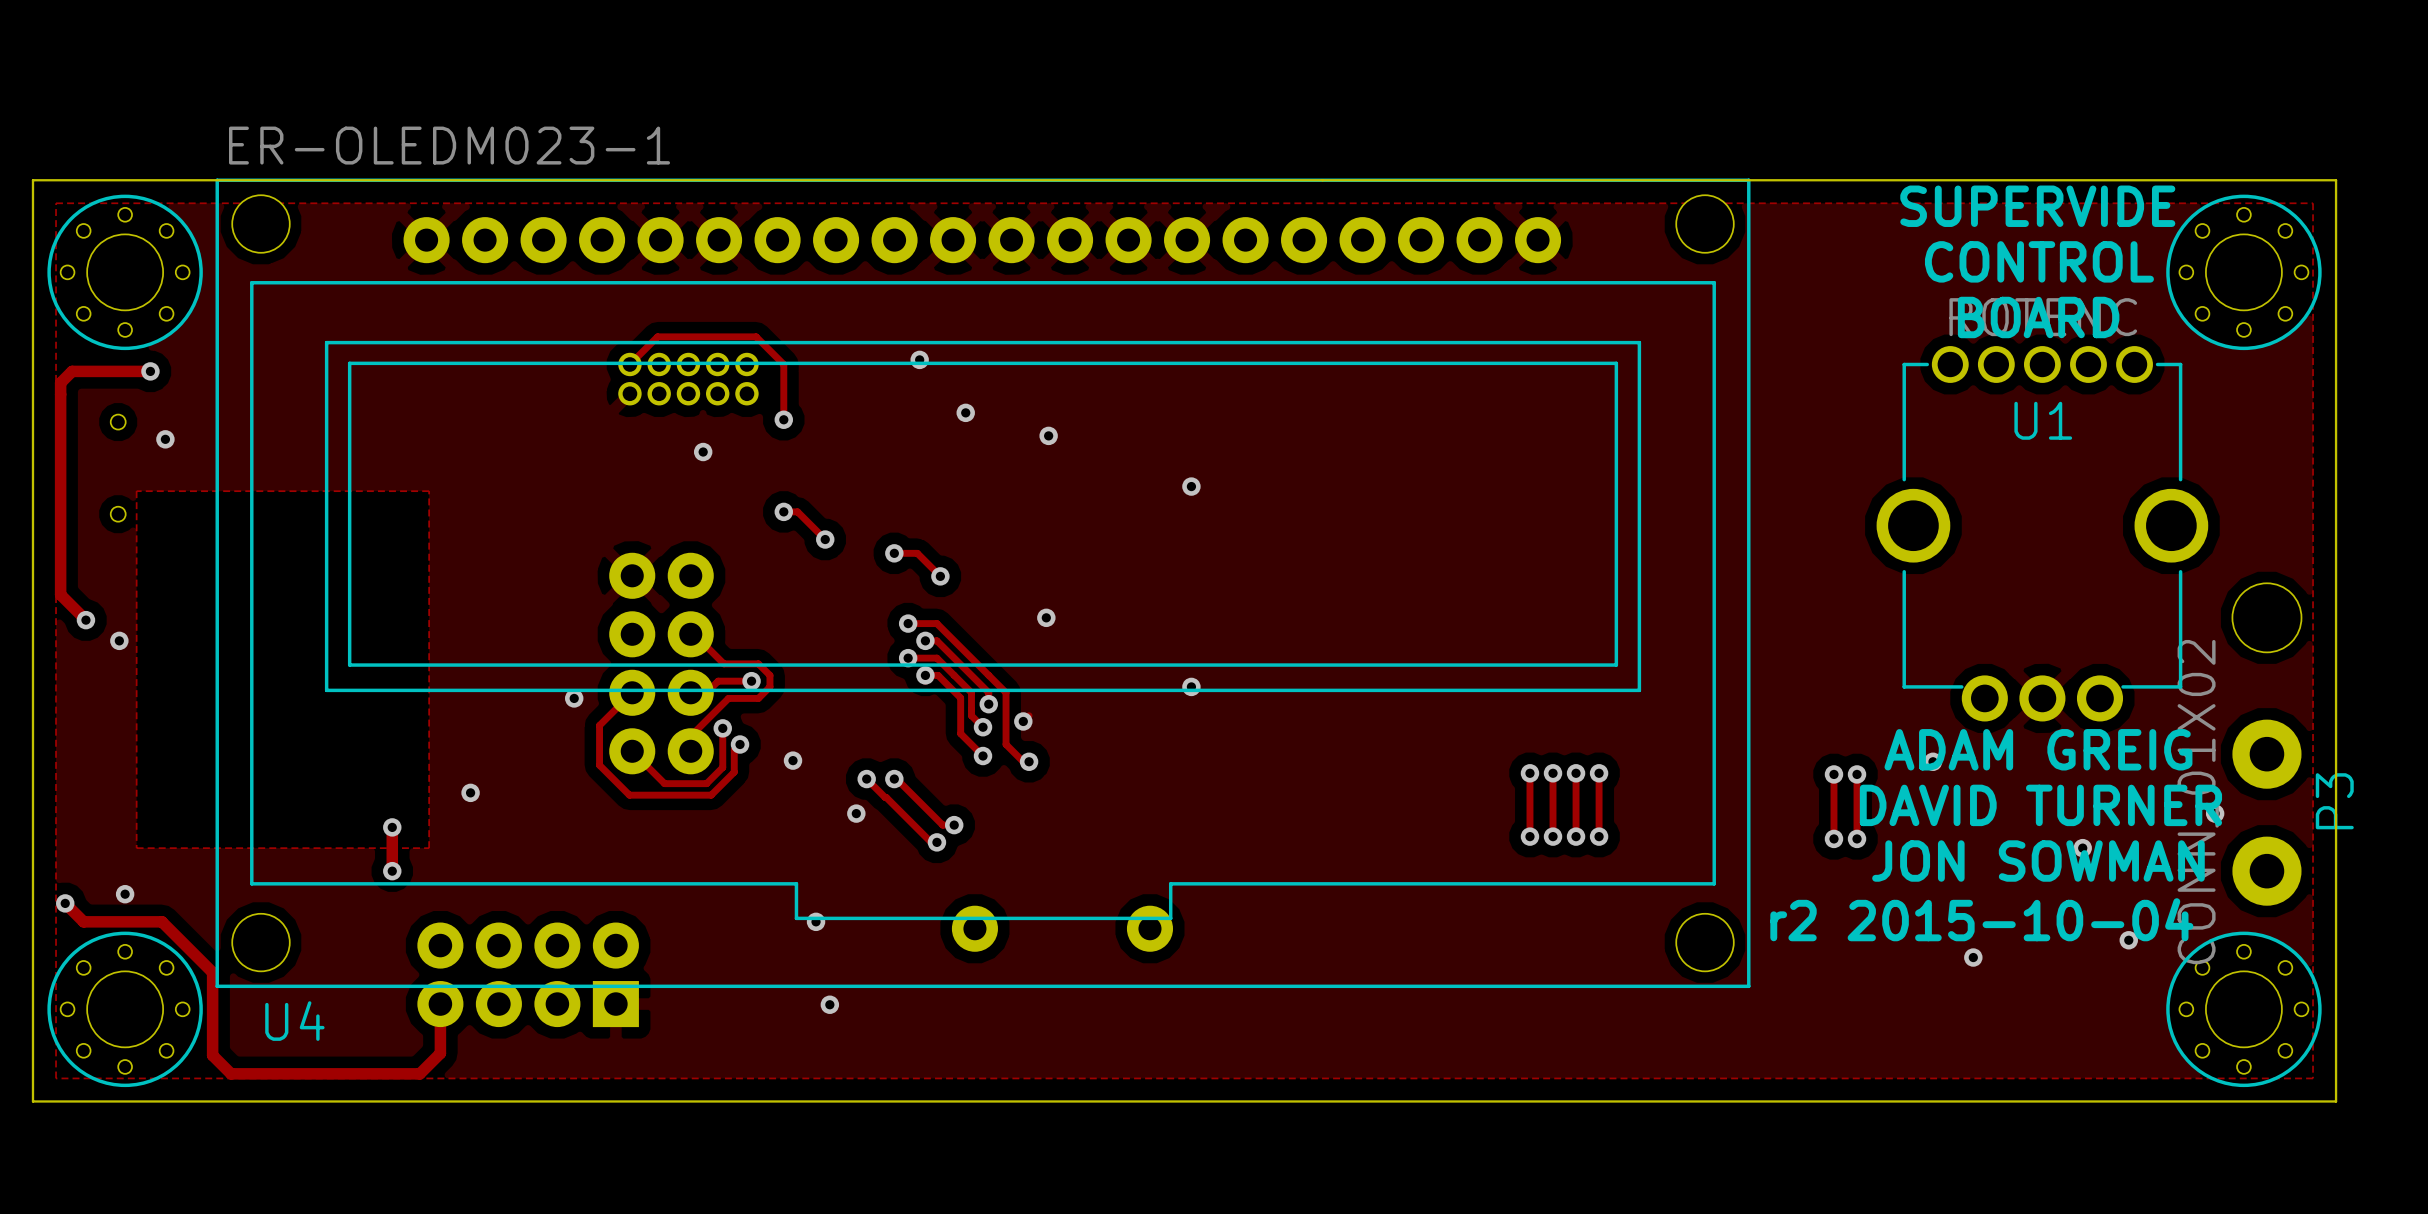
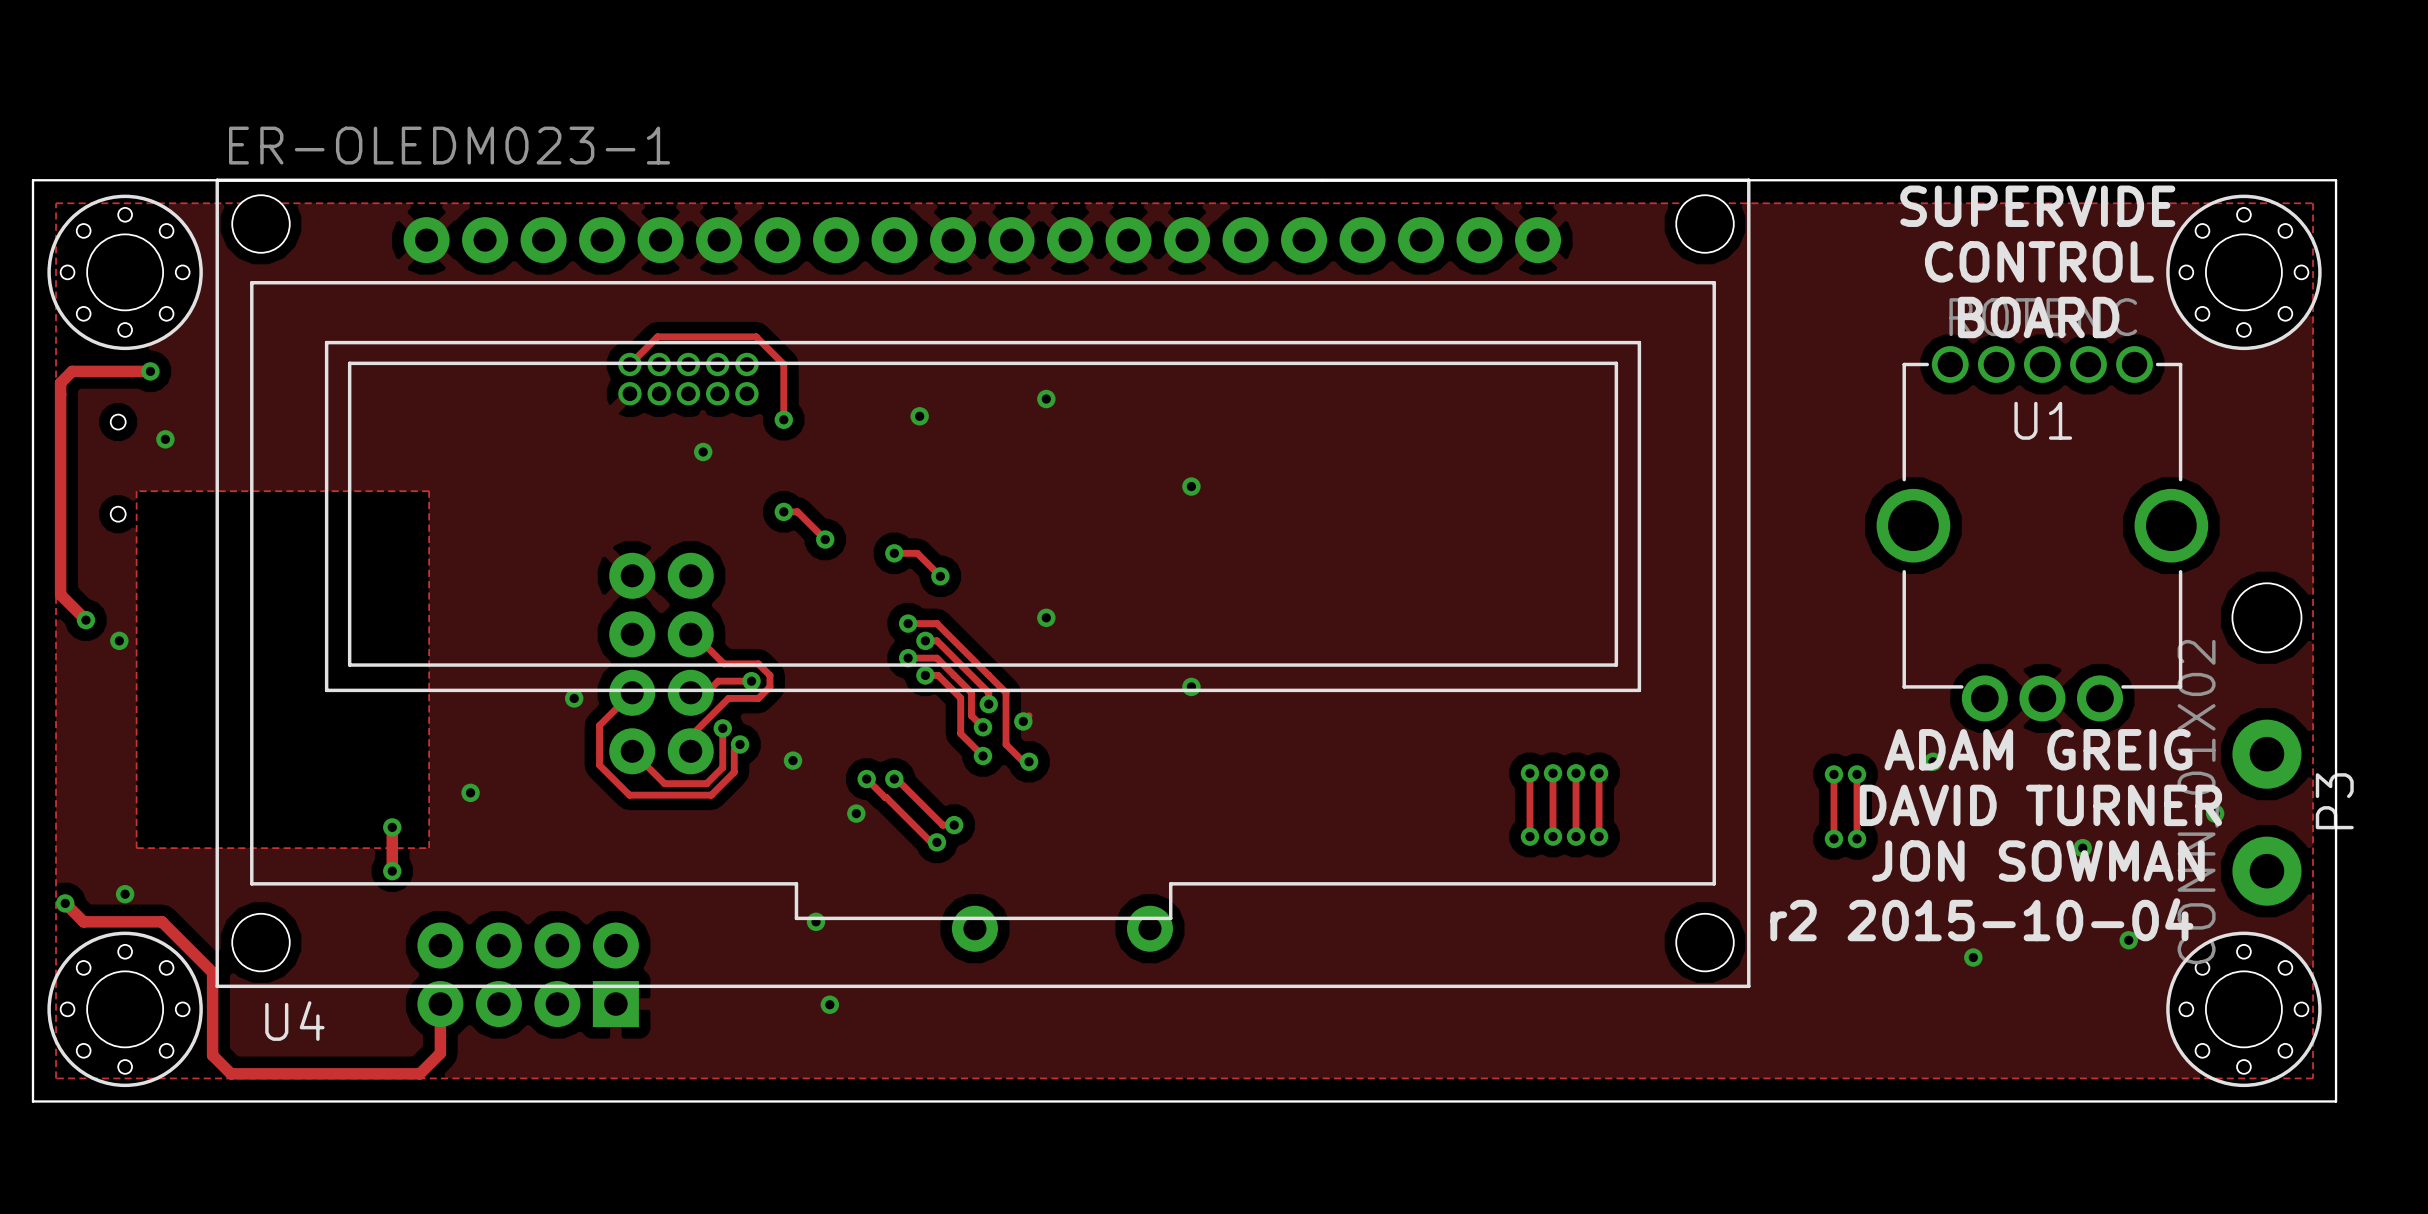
via: (919, 359) -> none
via: (965, 412) -> none
via: none -> (919, 416)
via position: (1048, 435) -> (1046, 399)

